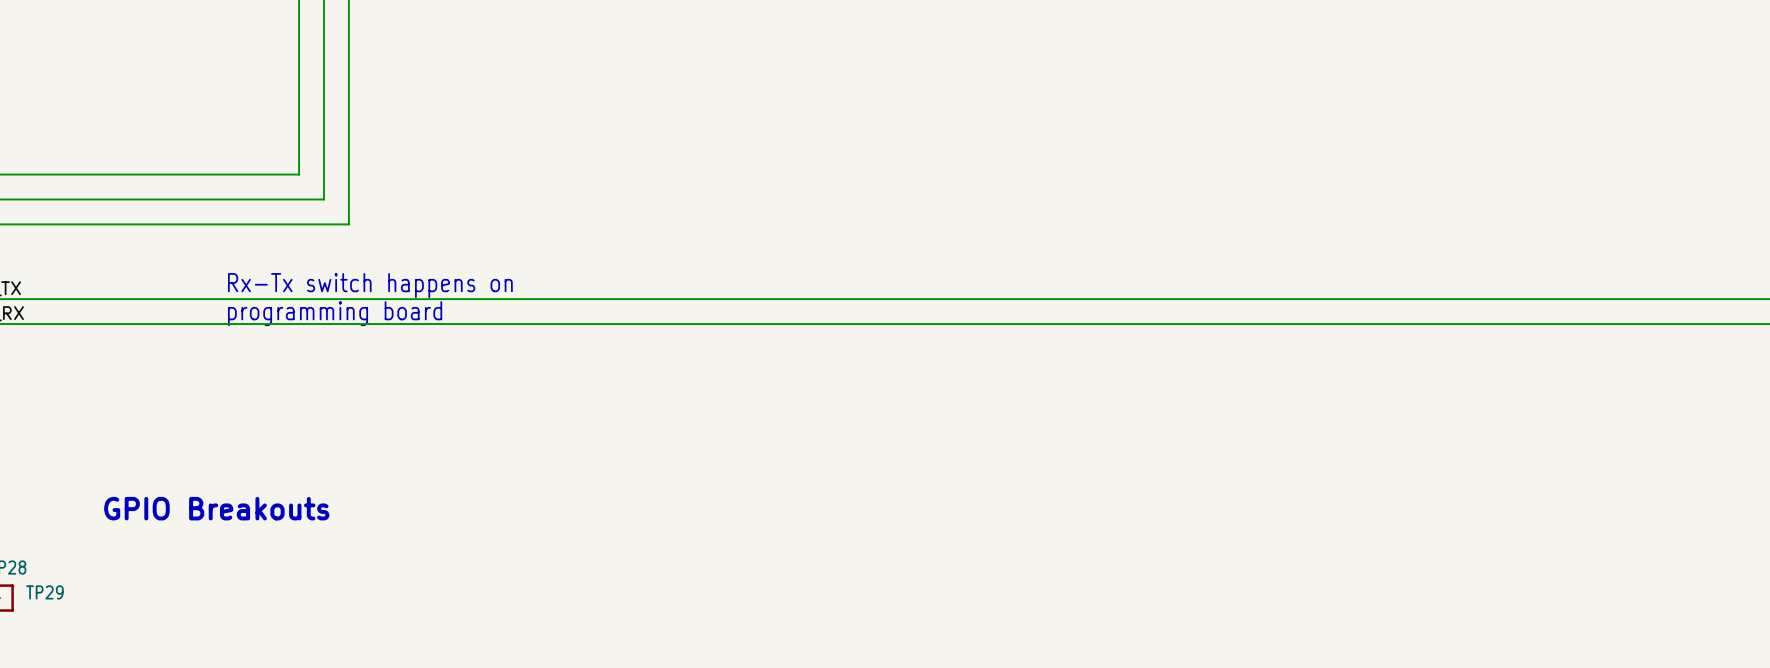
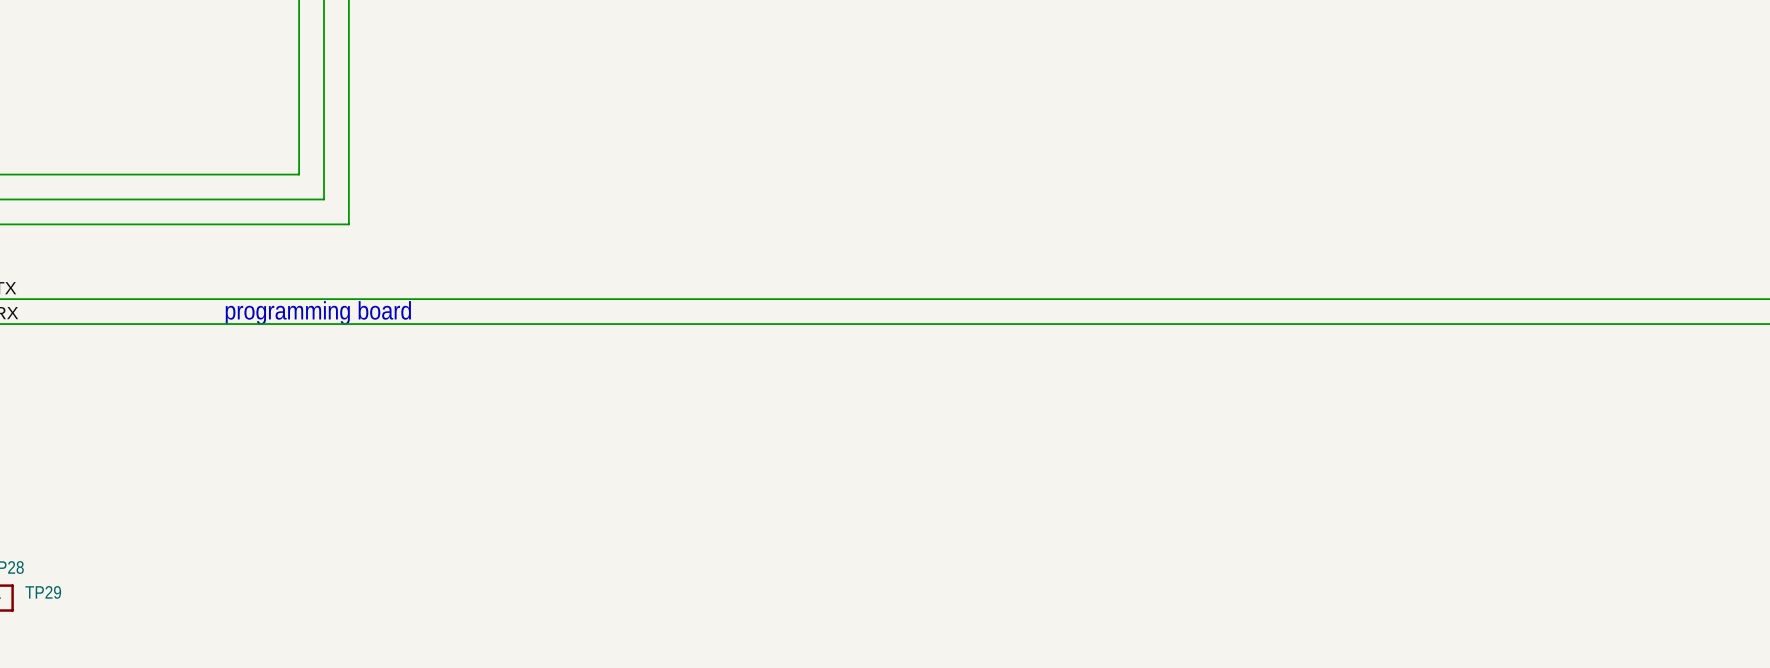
text: Rx-Tx switch happens on (370, 285) -> none
text: GPIO Breakouts (216, 508) -> none

